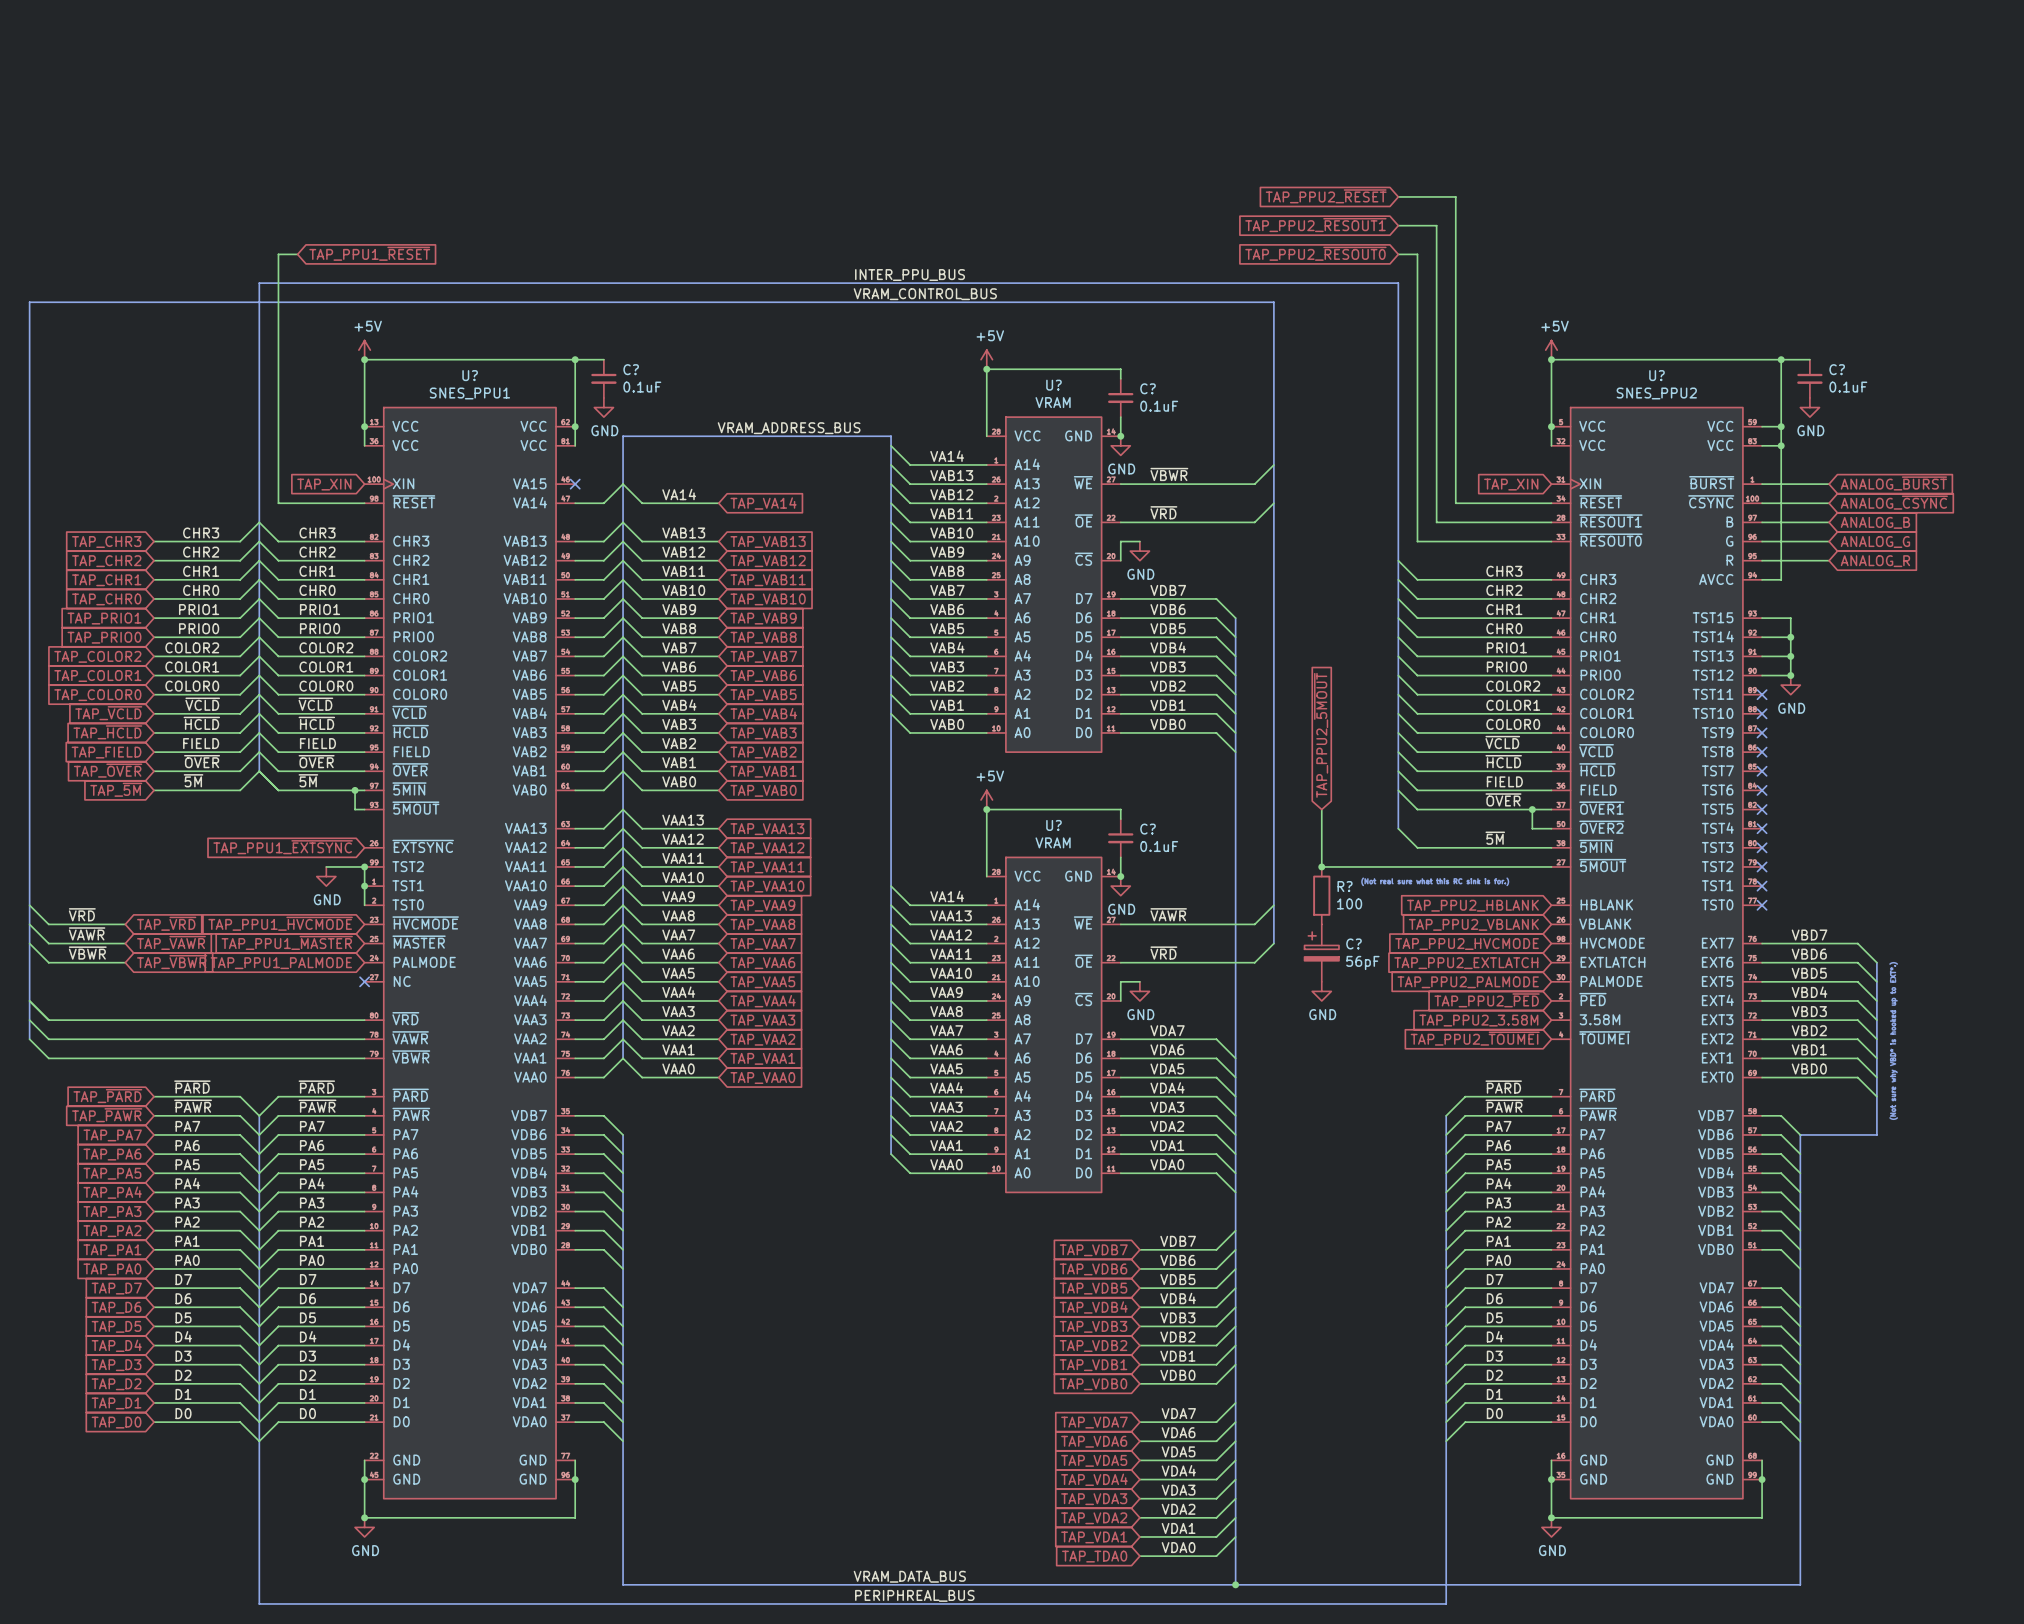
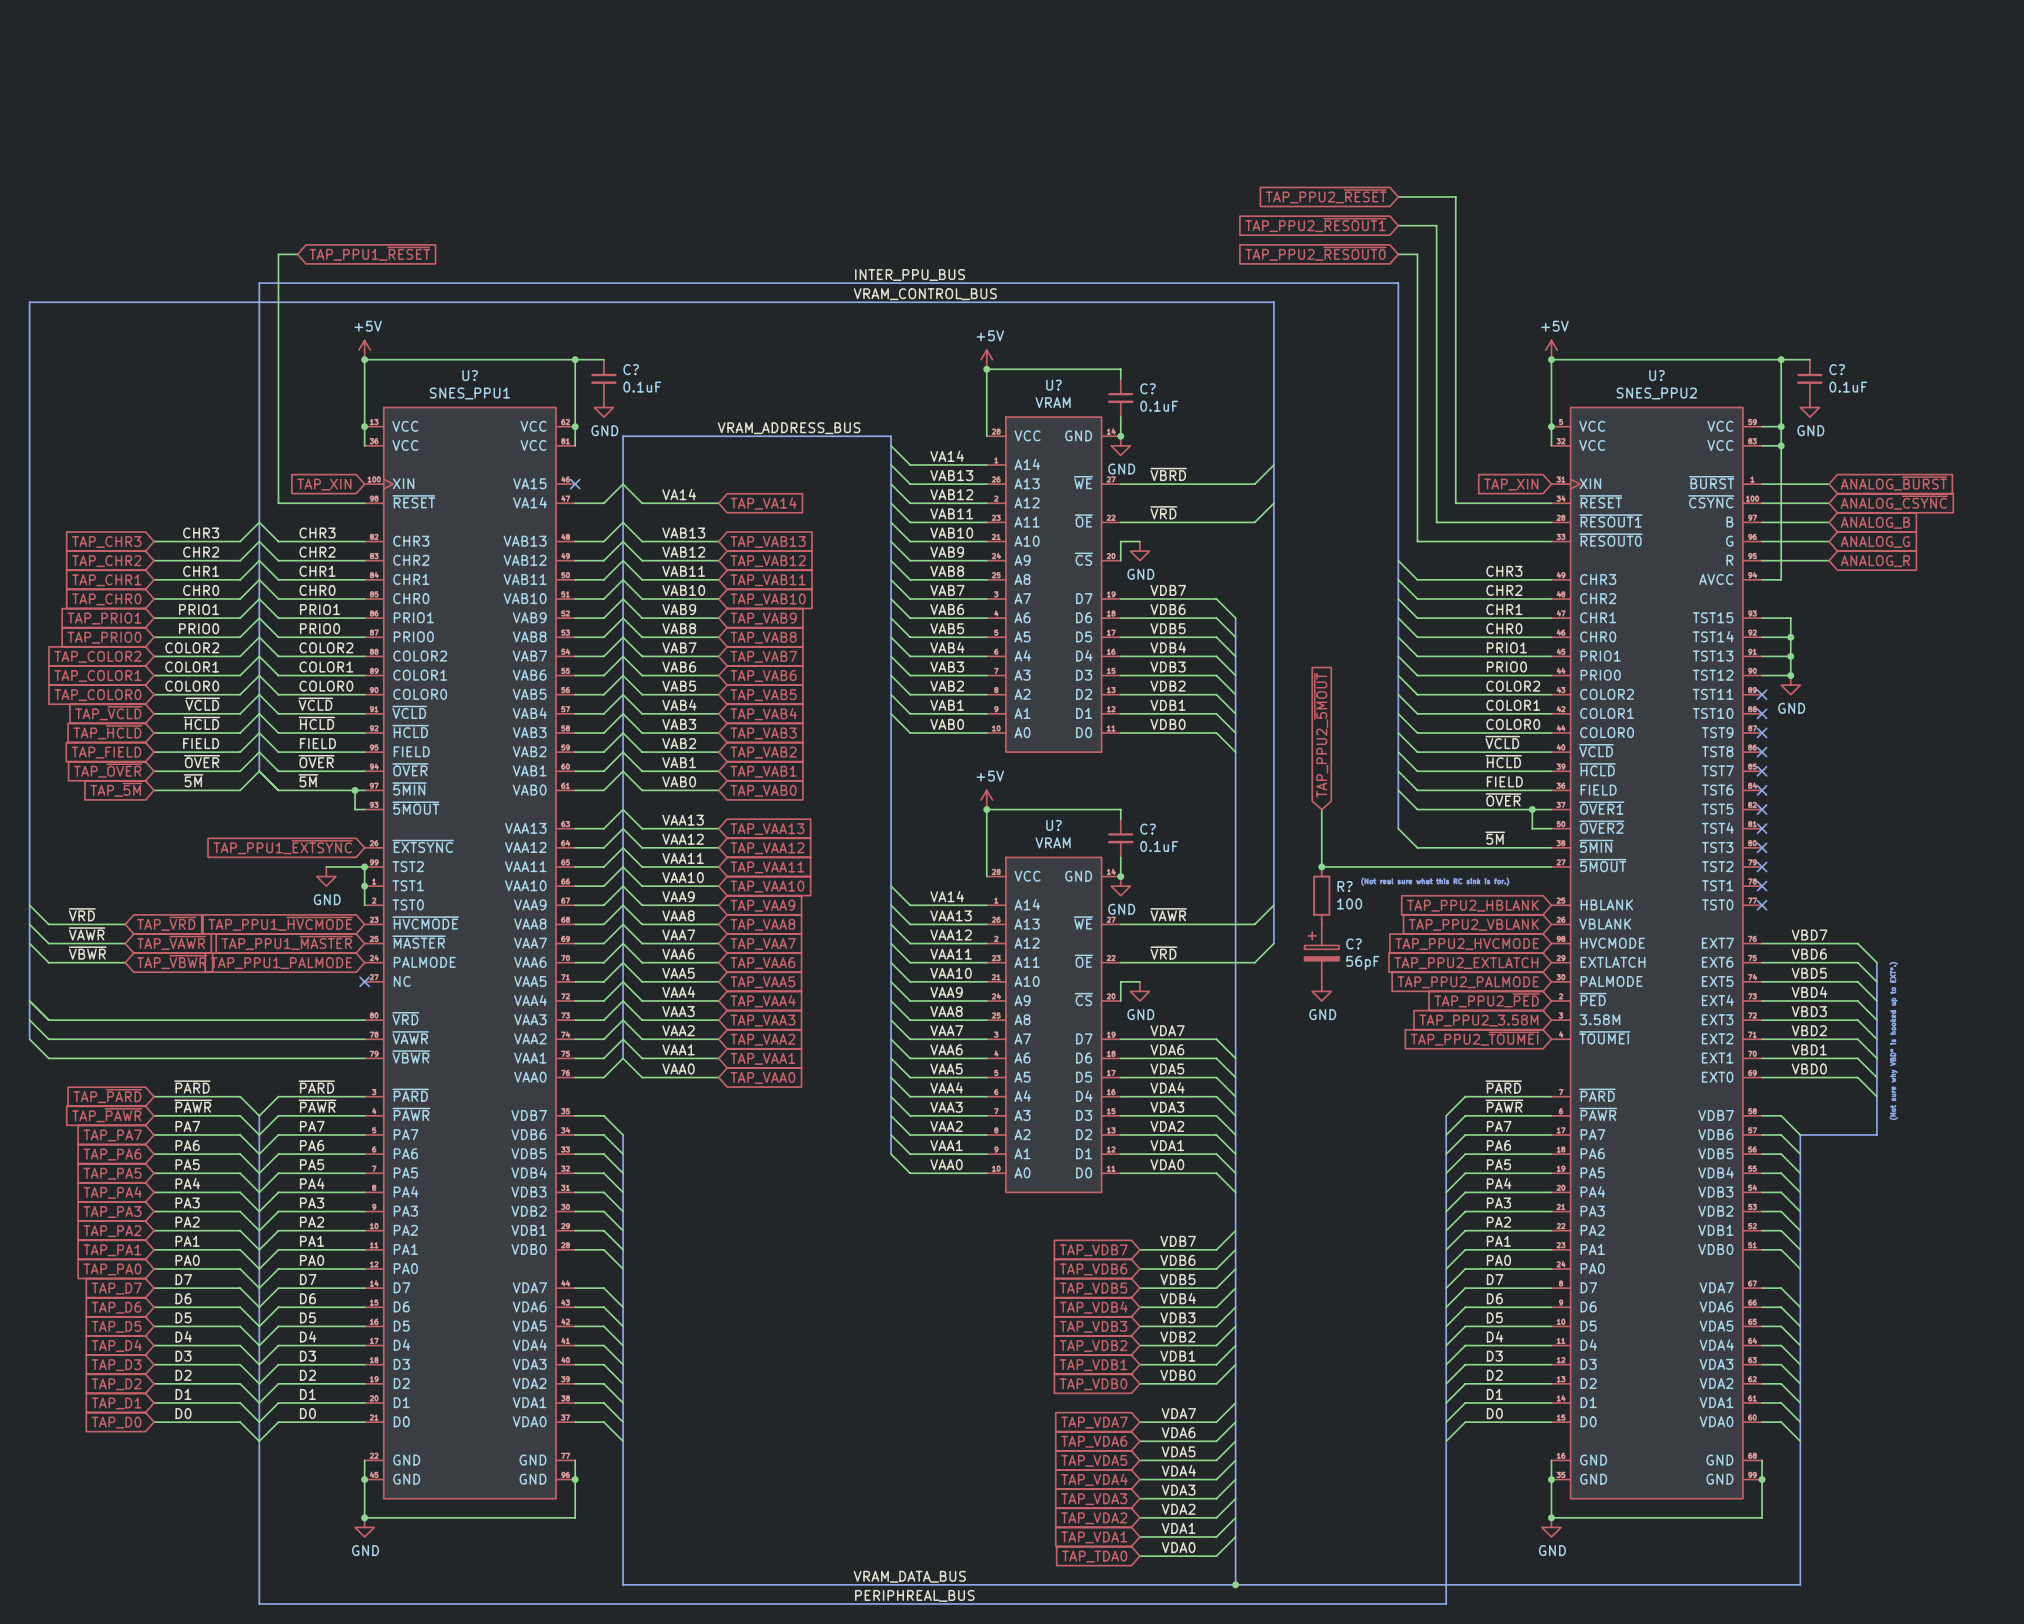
label: ~{VBWR} (1169, 474) -> ~{VBRD} (1168, 474)

